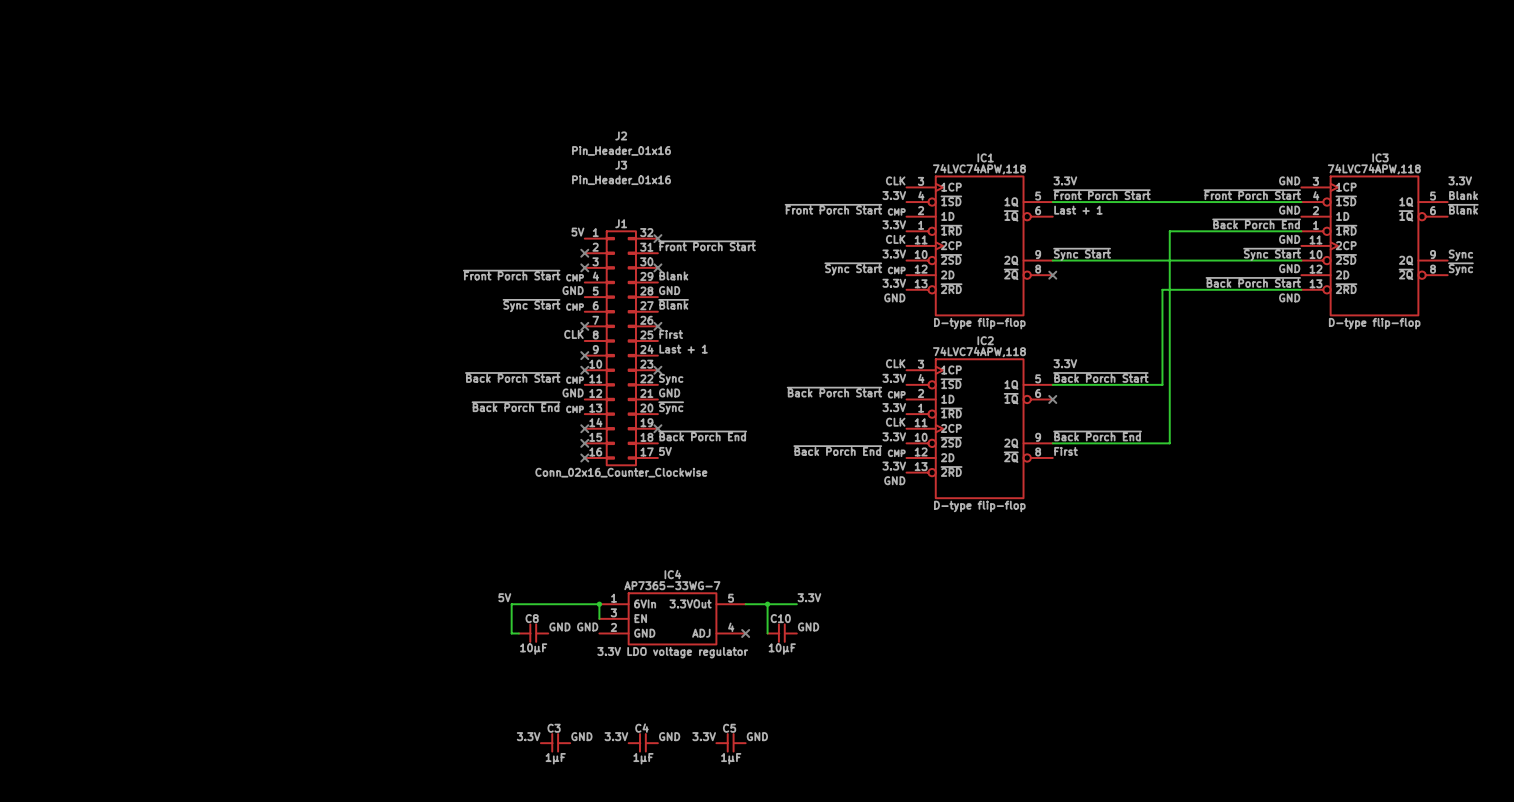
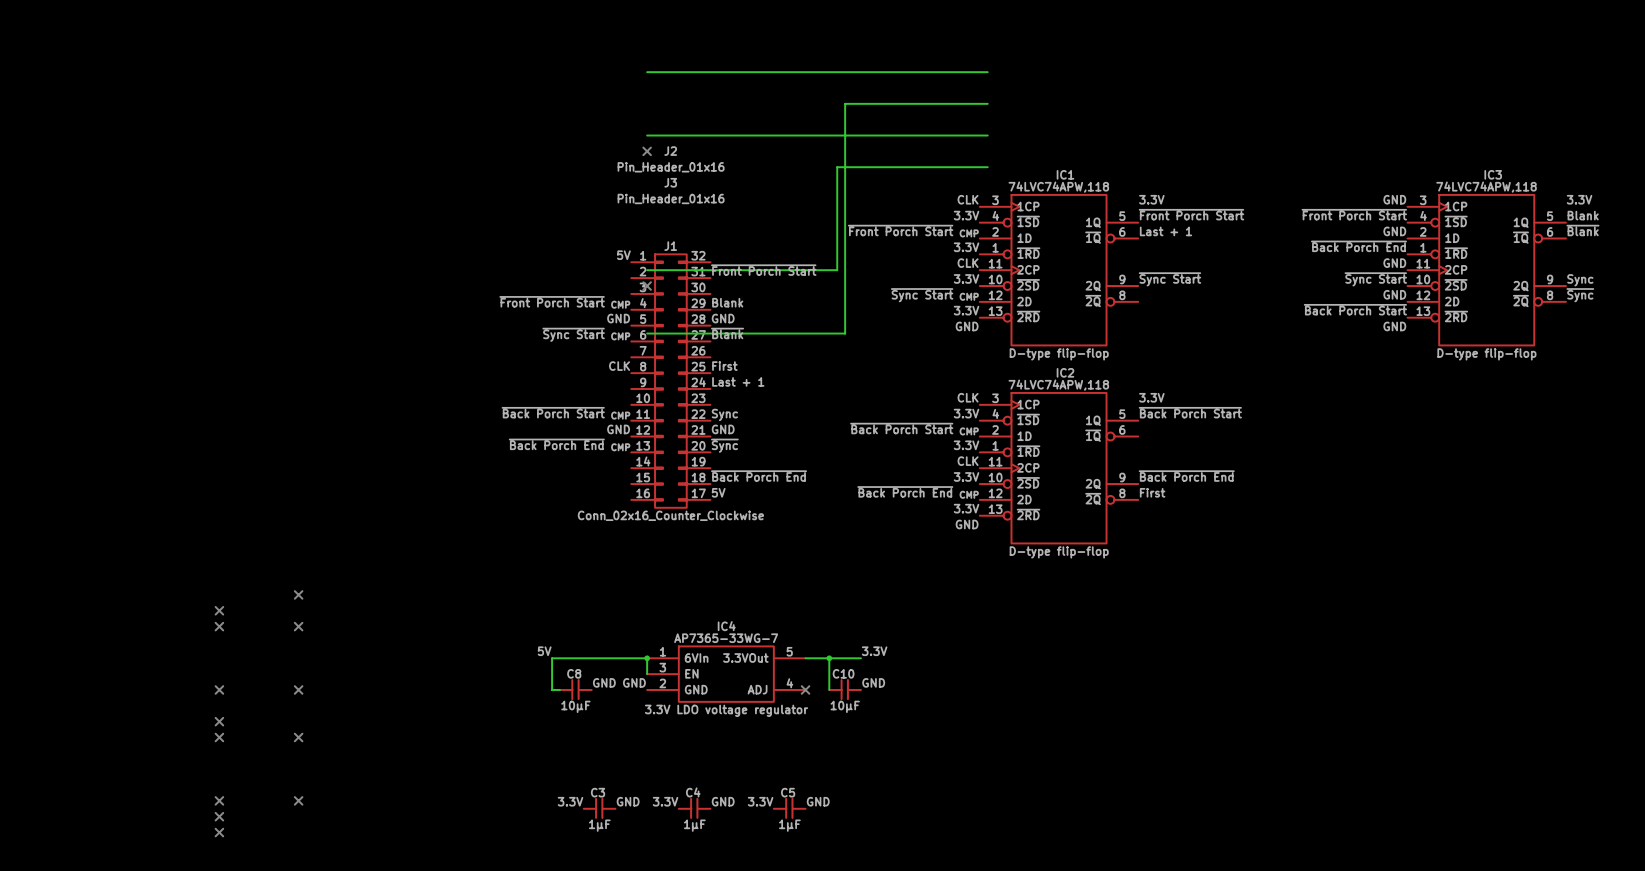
wire: none -> (647, 72) (987, 72)
wire: none -> (987, 103) (845, 103) (845, 333) (647, 333)
wire: none -> (647, 135) (987, 135)
no-connect mark: none -> (647, 151)
wire: none -> (987, 167) (837, 167) (837, 270) (647, 270)
wire: (1052, 202) (1301, 202) -> none
wire: (1301, 231) (1169, 231) (1169, 443) (1052, 443) -> none
no-connect mark: (657, 238) -> none
no-connect mark: (584, 253) -> none
no-connect mark: none -> (647, 286)
wire: (1052, 260) (1301, 260) -> none
no-connect mark: (584, 267) -> none
no-connect mark: (657, 267) -> none
no-connect mark: (1052, 275) -> none
wire: (1301, 289) (1162, 289) (1162, 384) (1052, 384) -> none
no-connect mark: (584, 326) -> none
no-connect mark: (657, 326) -> none
no-connect mark: (584, 355) -> none
no-connect mark: (584, 370) -> none
no-connect mark: (657, 370) -> none
no-connect mark: (1052, 399) -> none
no-connect mark: (584, 428) -> none
no-connect mark: (657, 428) -> none
no-connect mark: (584, 443) -> none
no-connect mark: (584, 457) -> none
no-connect mark: none -> (298, 594)
no-connect mark: none -> (219, 610)
no-connect mark: none -> (219, 626)
no-connect mark: none -> (298, 626)
no-connect mark: none -> (219, 689)
no-connect mark: none -> (298, 689)
no-connect mark: none -> (219, 721)
no-connect mark: none -> (219, 737)
no-connect mark: none -> (298, 737)
no-connect mark: none -> (219, 800)
no-connect mark: none -> (298, 800)
no-connect mark: none -> (219, 816)
no-connect mark: none -> (219, 832)

